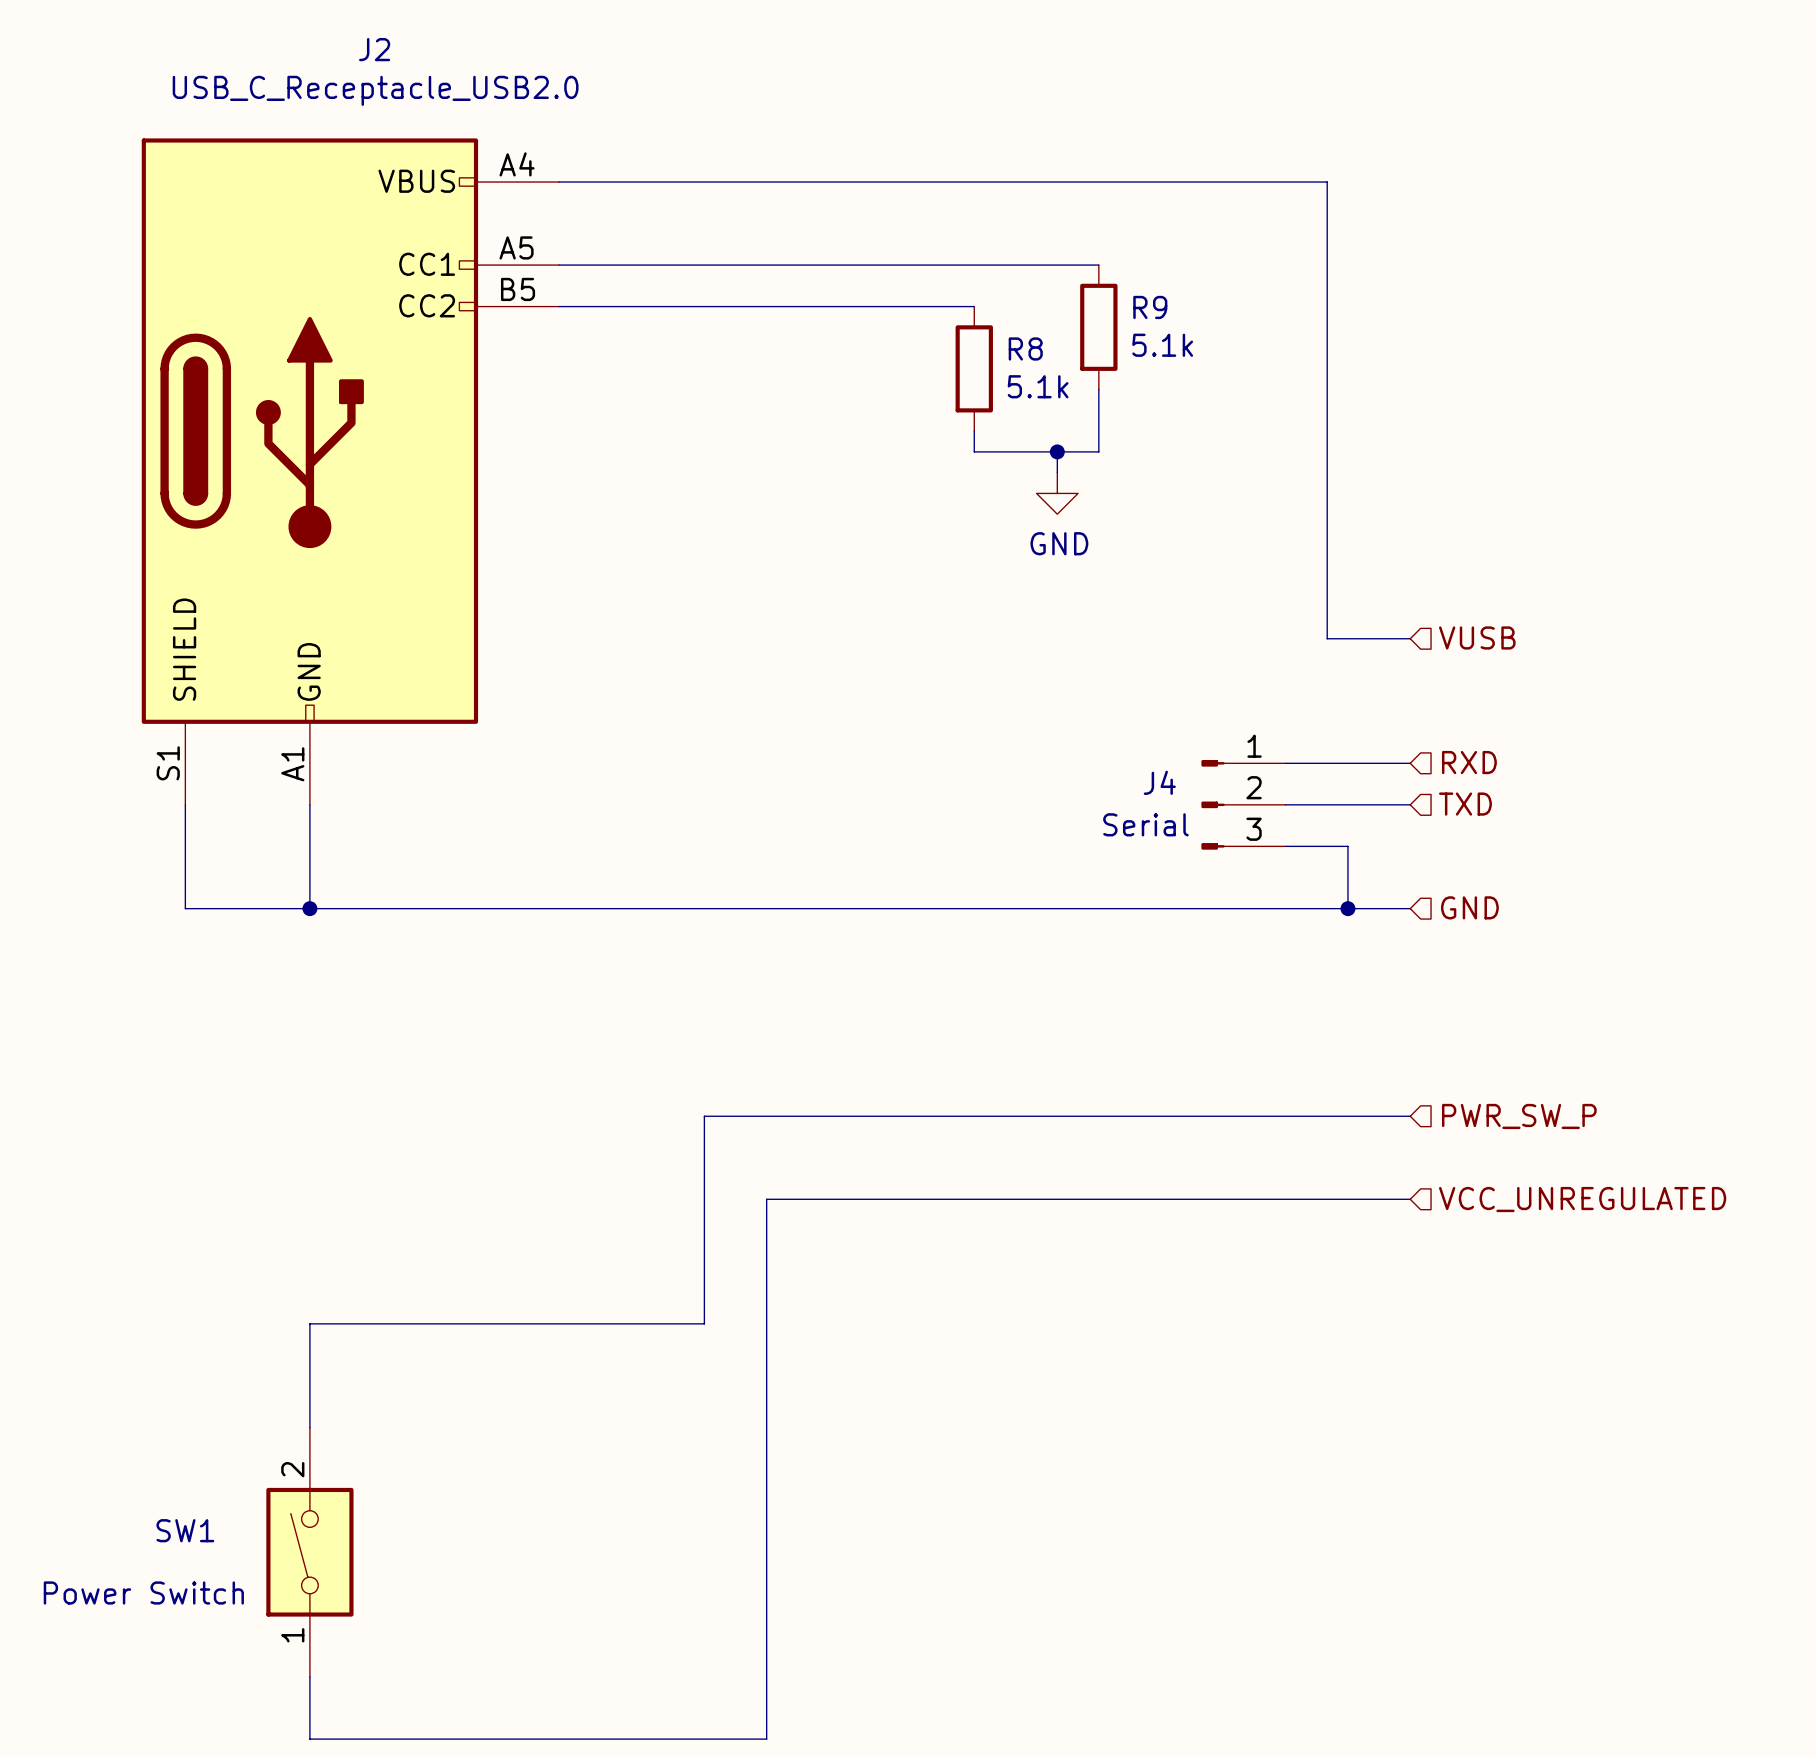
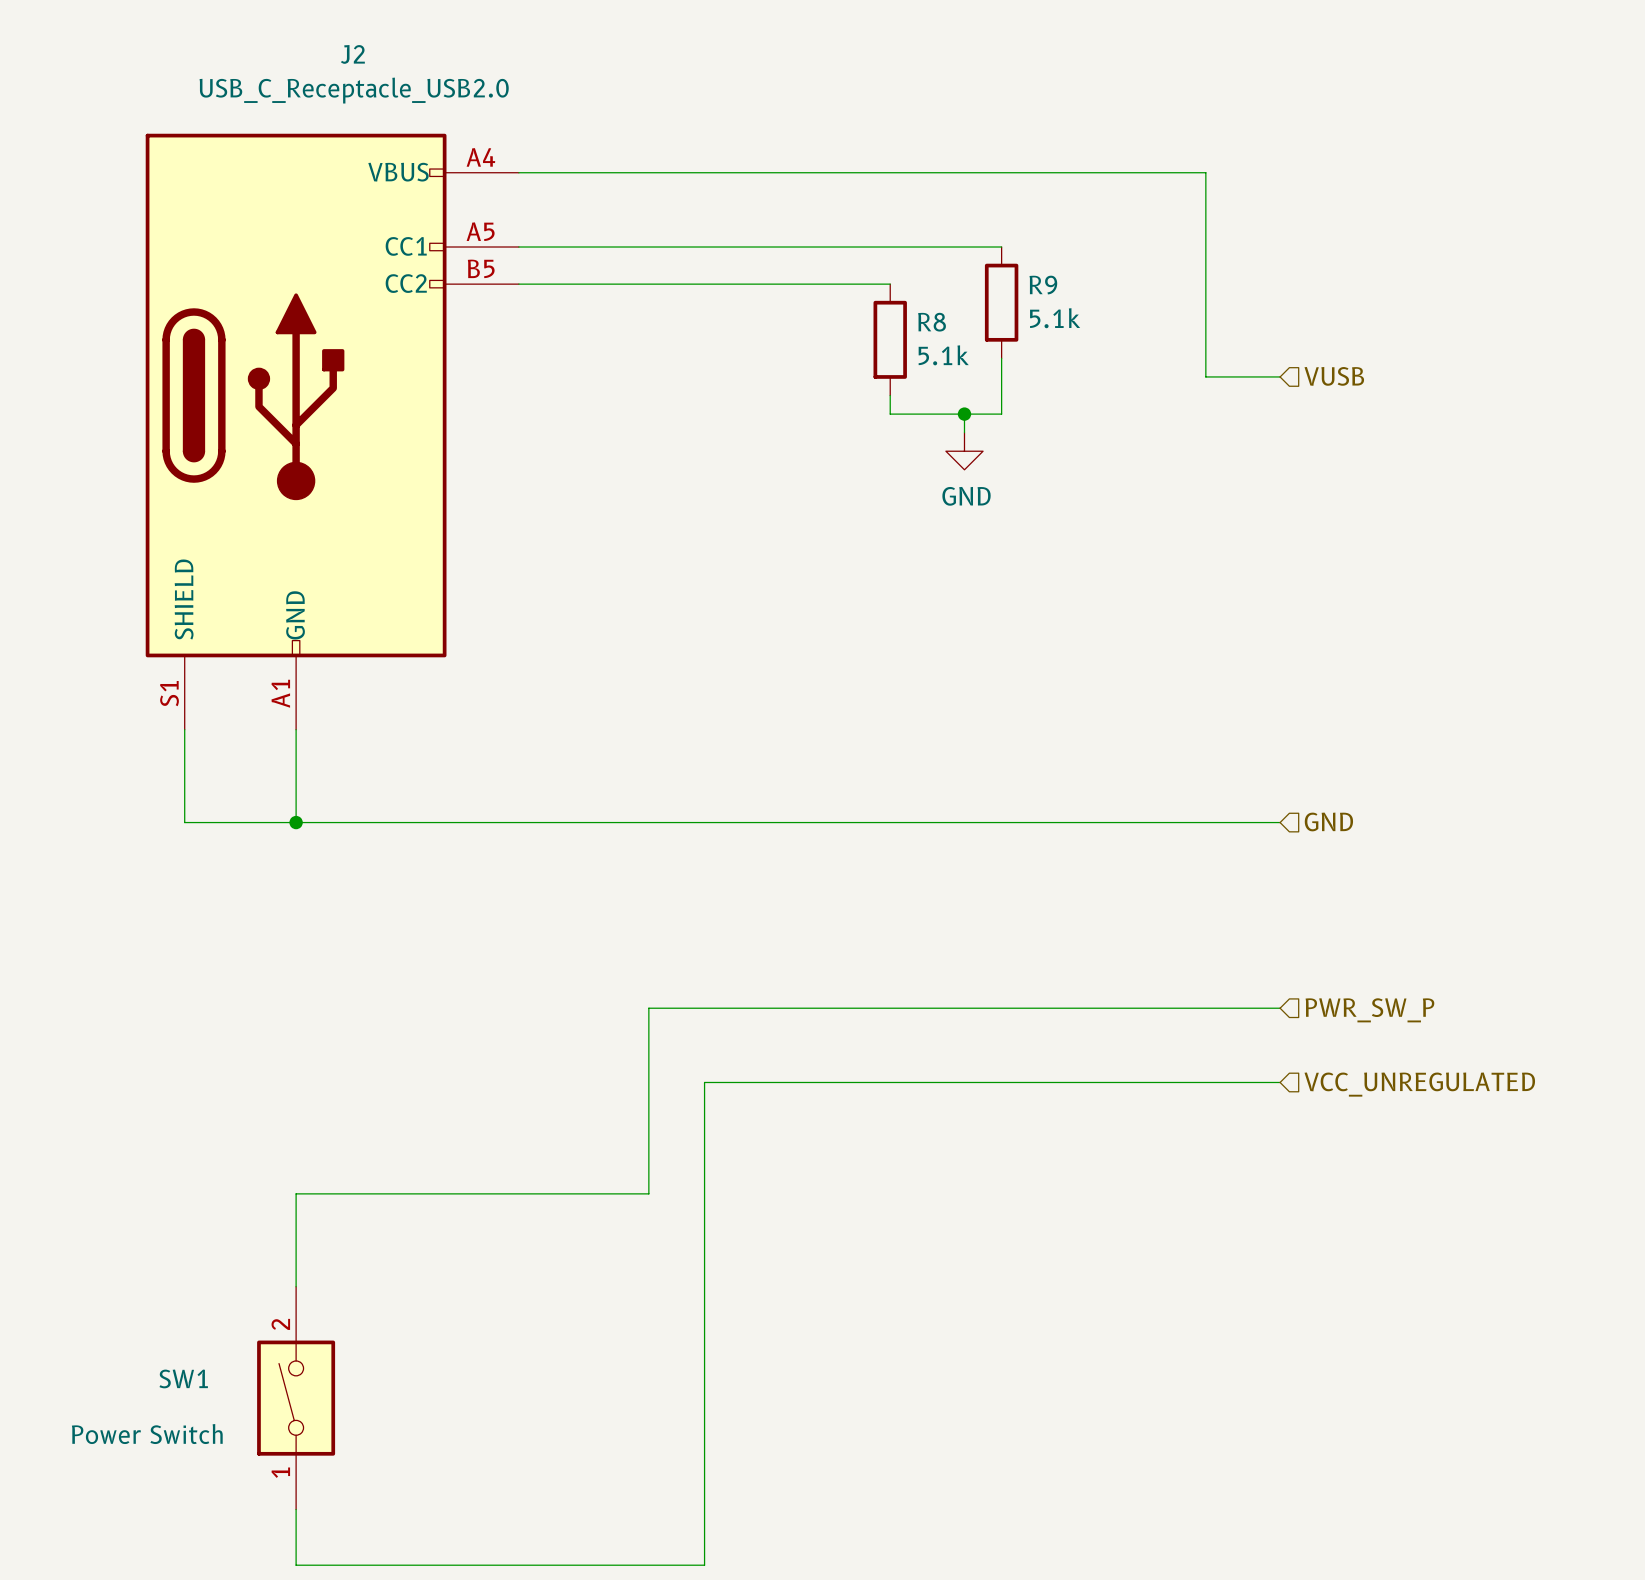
wire: (1327, 410) (1327, 638) (1410, 638) -> (1205, 376) (1280, 376)
hierarchical label position: VUSB (1477, 637) -> VUSB (1334, 376)
hierarchical label: RXD (1469, 762) -> none
wire: (1285, 763) (1410, 763) -> none
J4: Serial (1243, 804) -> none
wire: (1285, 804) (1410, 804) -> none
hierarchical label: TXD (1465, 804) -> none
wire: (1285, 846) (1347, 846) (1347, 908) -> none
junction: (1347, 908) -> none

